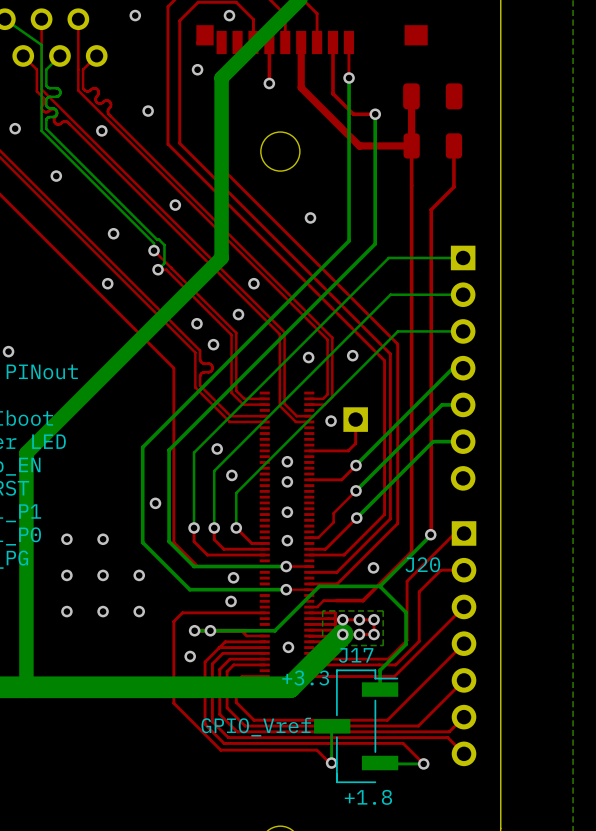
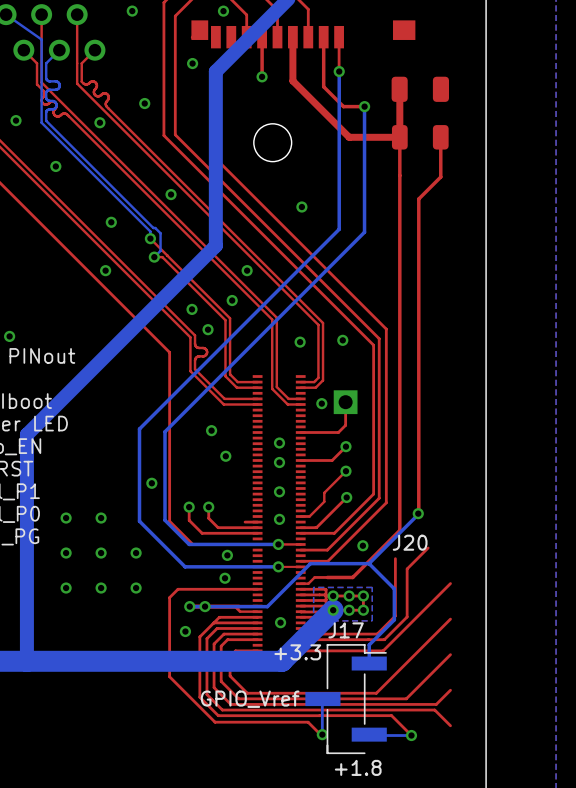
bottom track: (464, 257) (388, 257) (194, 452) (194, 527) -> none
bottom track: (464, 294) (390, 294) (214, 471) (214, 527) -> none
bottom track: (464, 331) (397, 331) (236, 493) (236, 527) -> none
part: (463, 368) -> none
bottom track: (464, 368) (453, 368) (356, 465) -> none
bottom track: (464, 404) (441, 404) (356, 490) -> none
bottom track: (464, 441) (433, 441) (356, 518) -> none
top track: (236, 527) (251, 543) -> none
via: (236, 527) -> none
top track: (464, 533) (454, 533) (407, 581) -> none
top track: (464, 570) (440, 570) -> none
part: (464, 643) -> none

